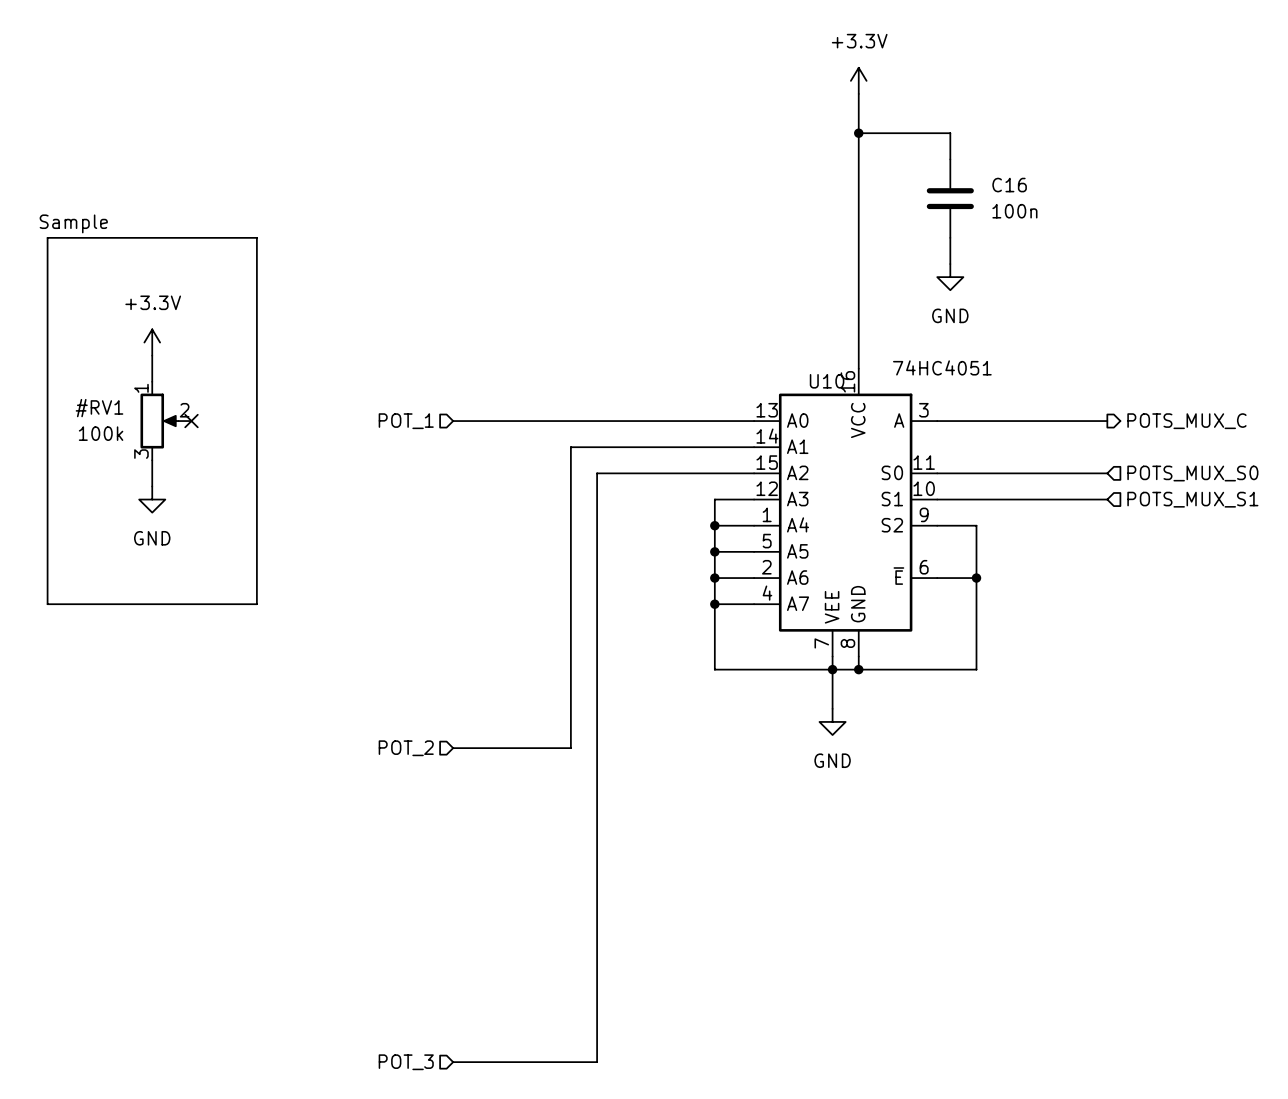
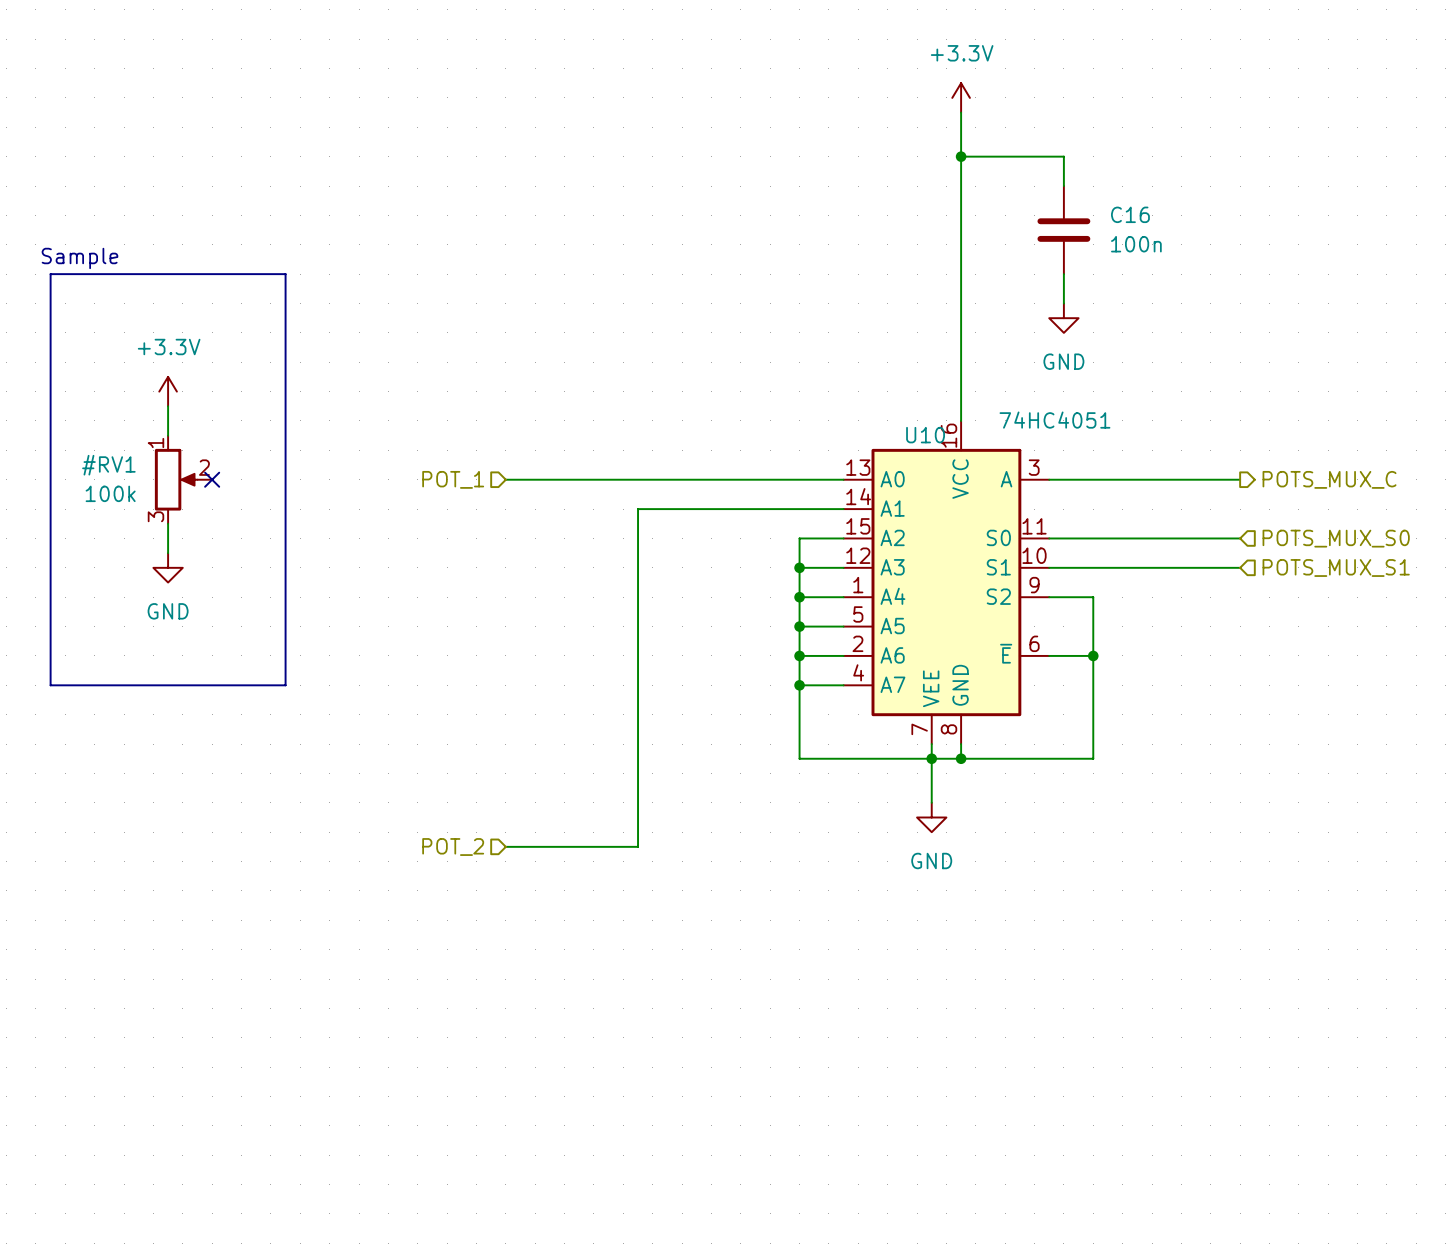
wire: (714, 473) (597, 473) (597, 1062) (453, 1062) -> (799, 538) (799, 567)
junction: none -> (799, 567)
hierarchical label: POT_3 (406, 1062) -> none

